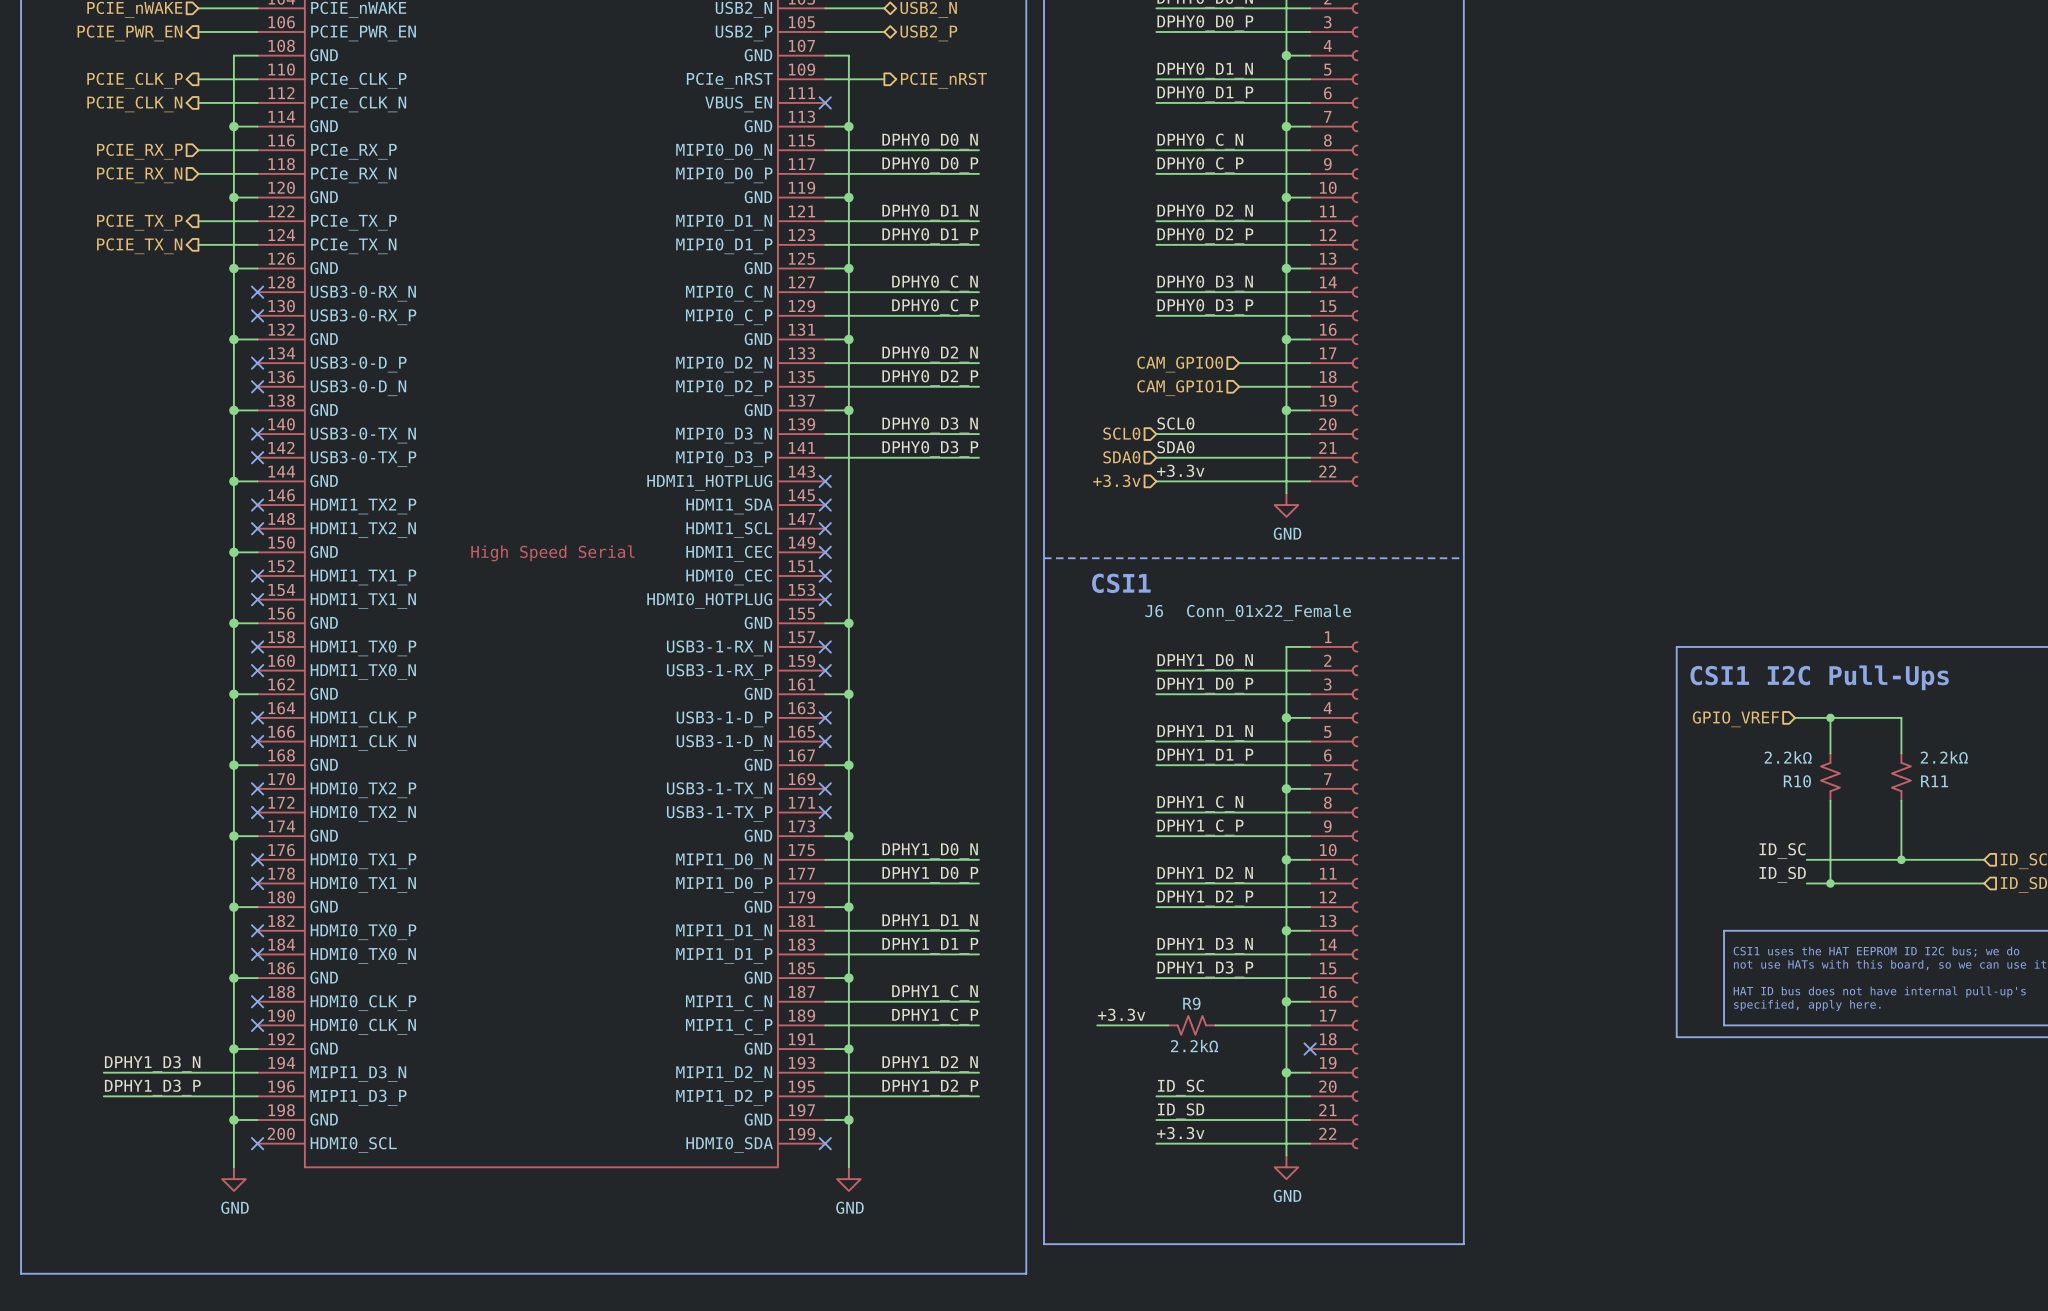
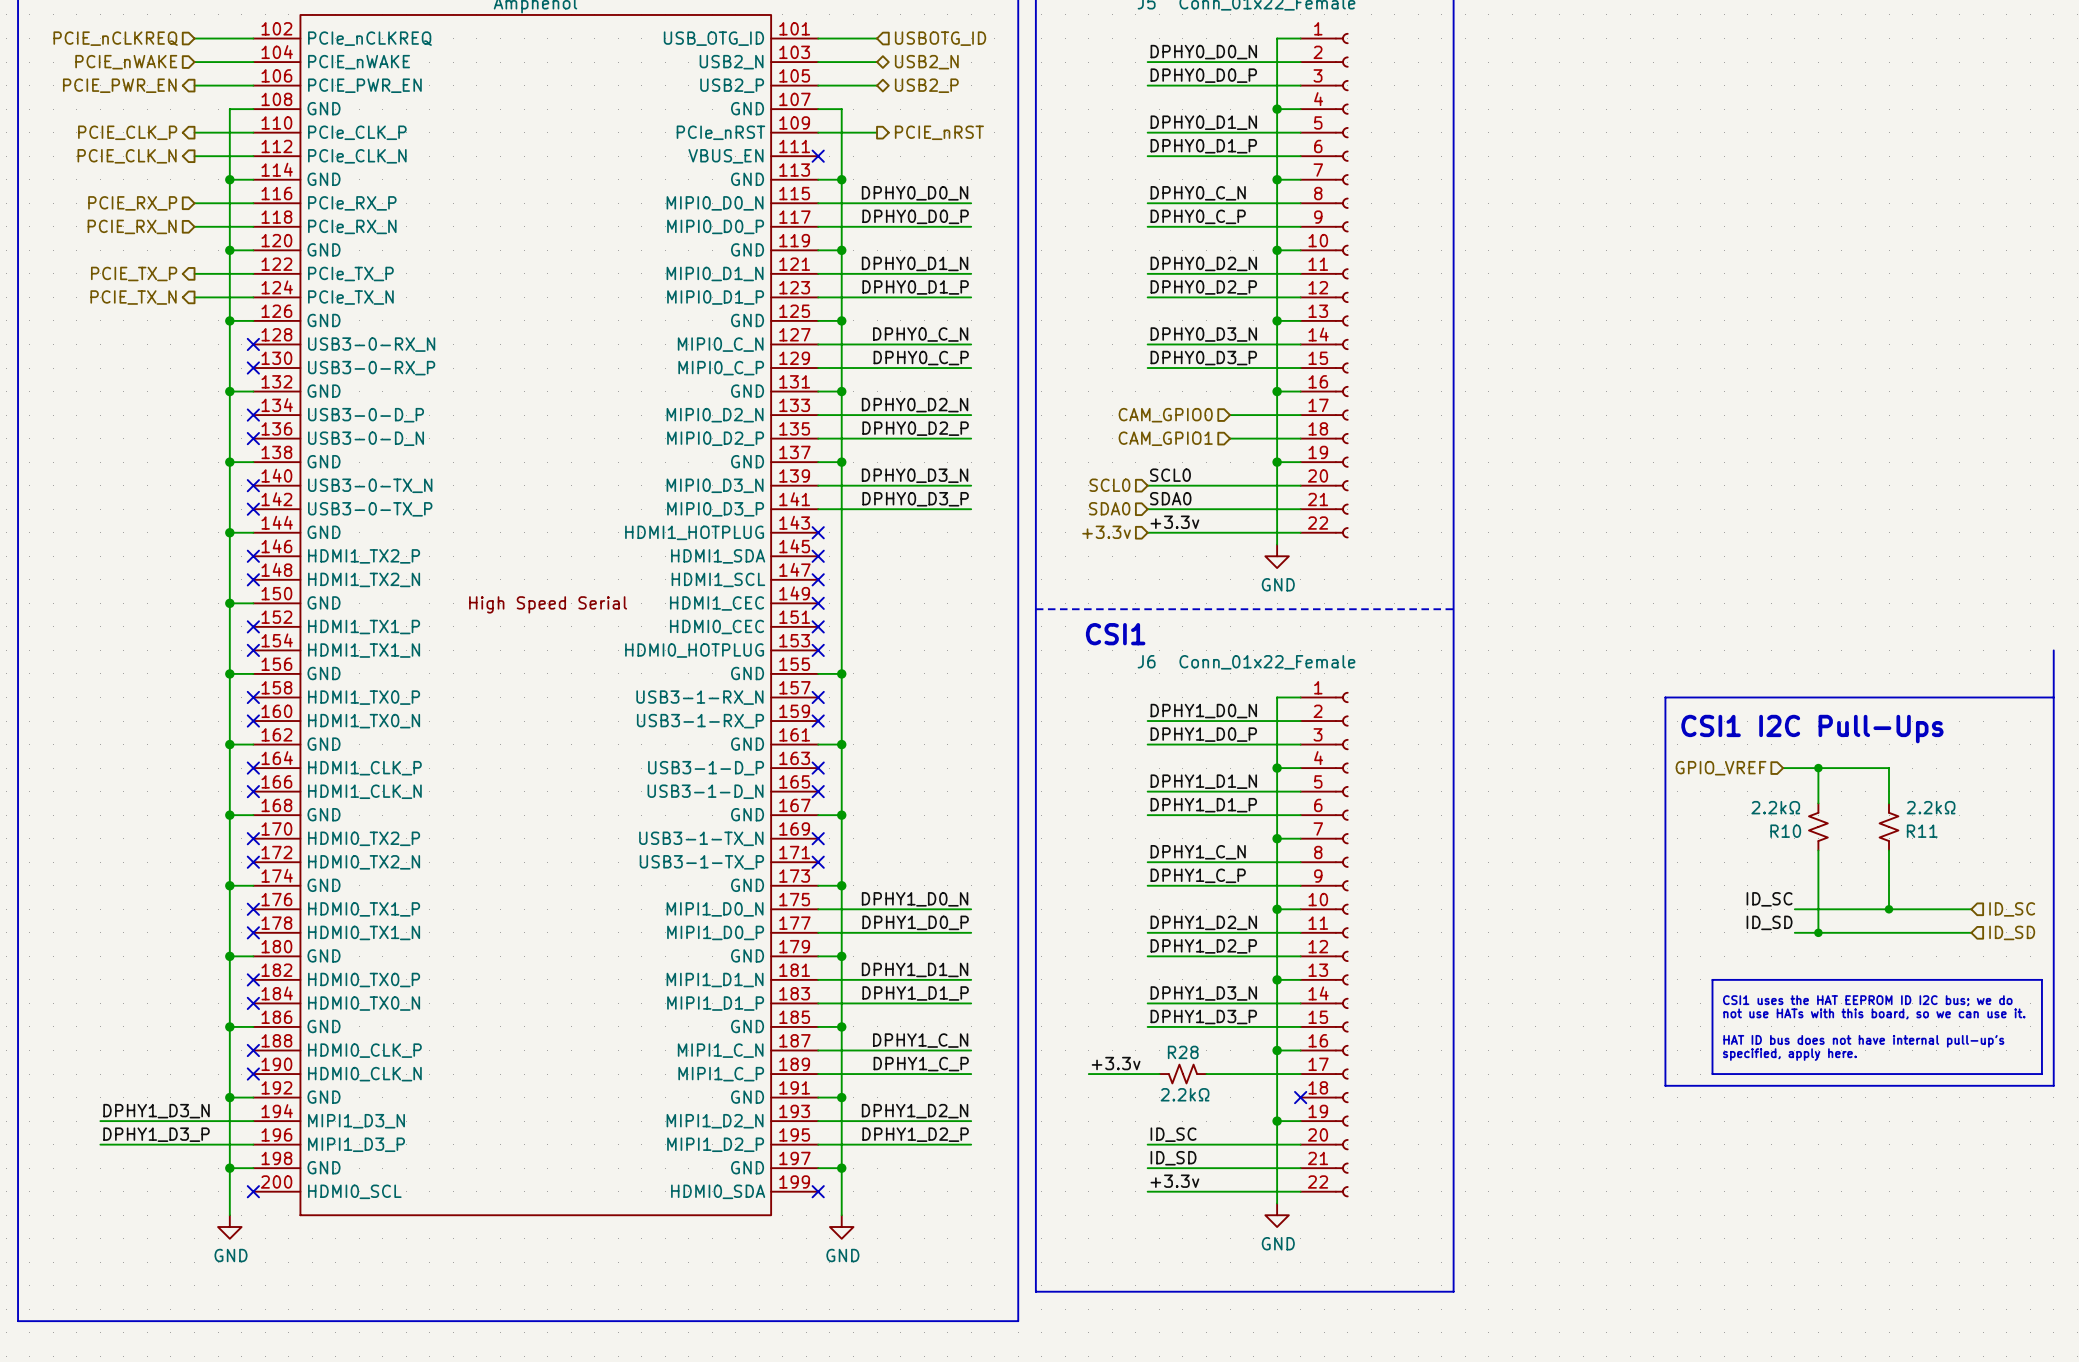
R9 name: R9 (1191, 1003) -> R28 (1183, 1052)

